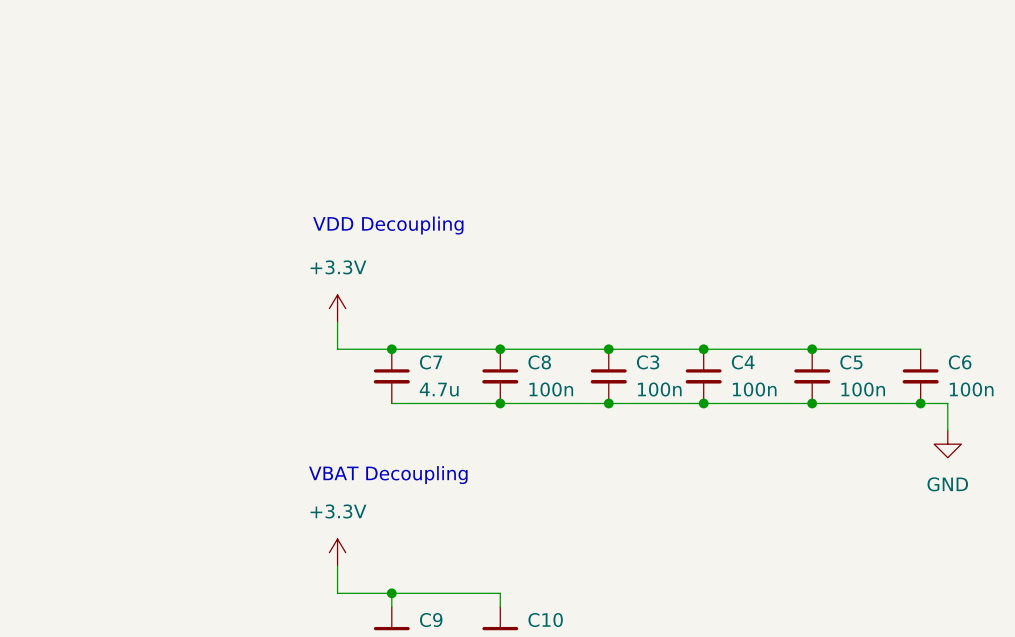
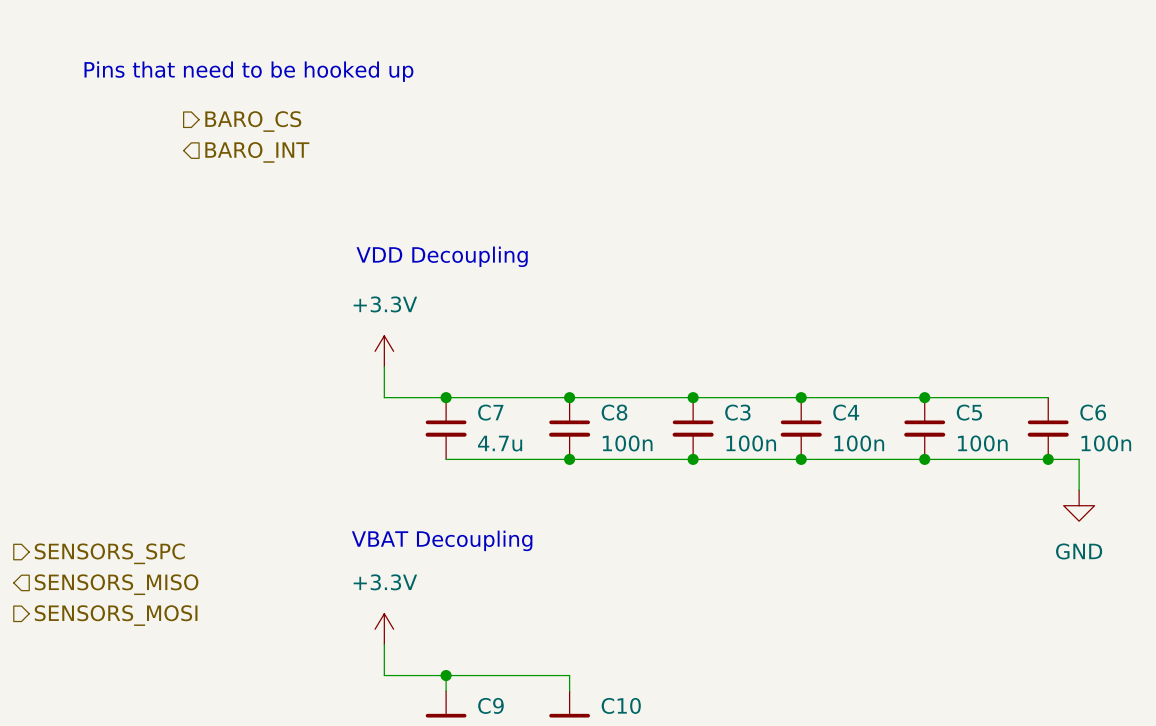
text: none -> Pins that need to be hooked up (248, 71)
hierarchical label: none -> BARO_CS (253, 121)
hierarchical label: none -> BARO_INT (257, 152)
hierarchical label: none -> SENSORS_SPC (109, 553)
hierarchical label: none -> SENSORS_MISO (116, 584)
hierarchical label: none -> SENSORS_MOSI (116, 615)

